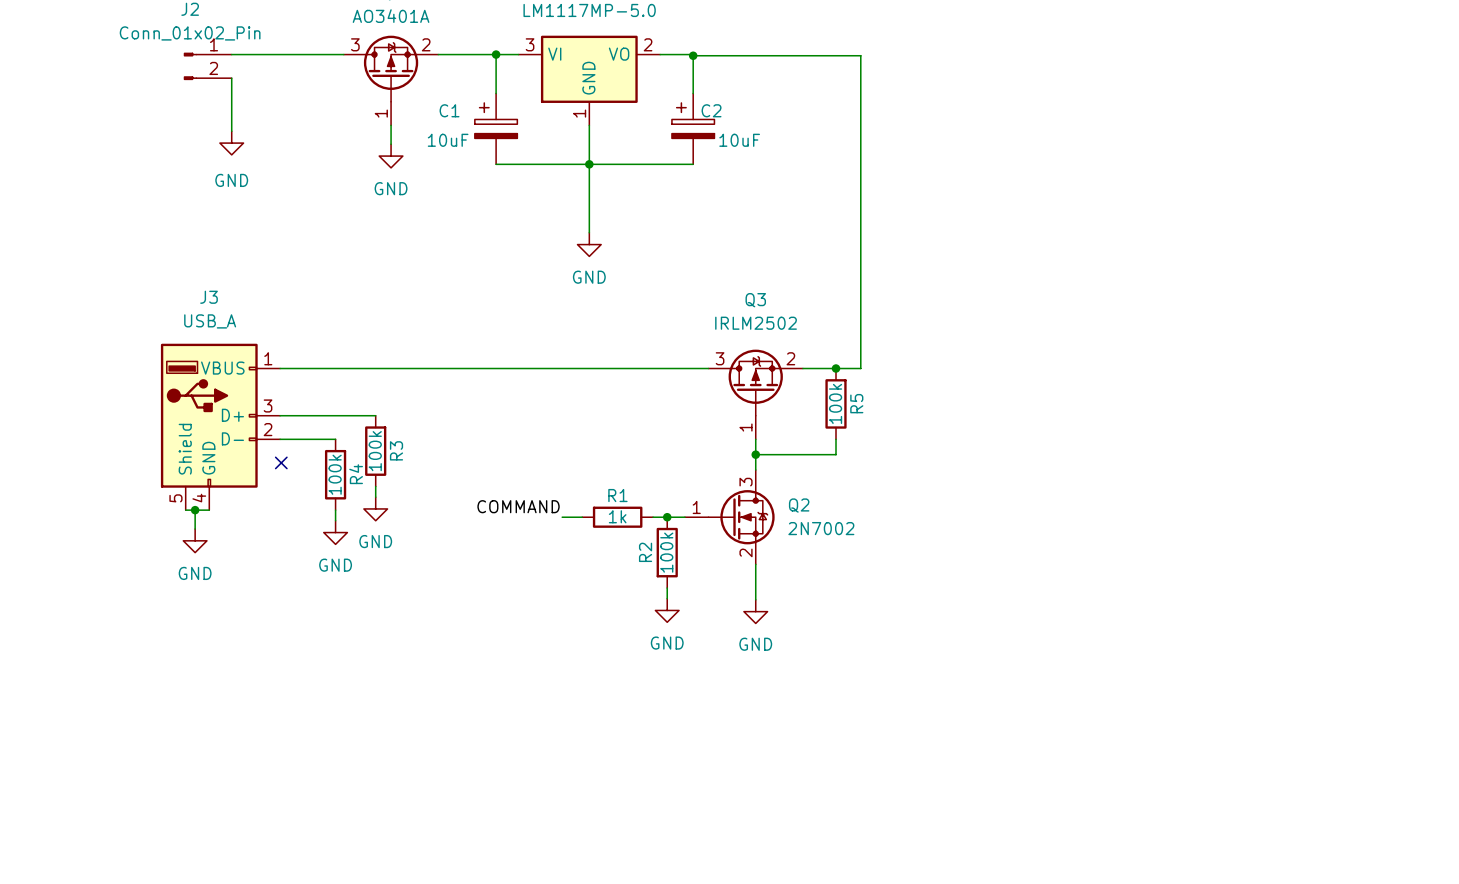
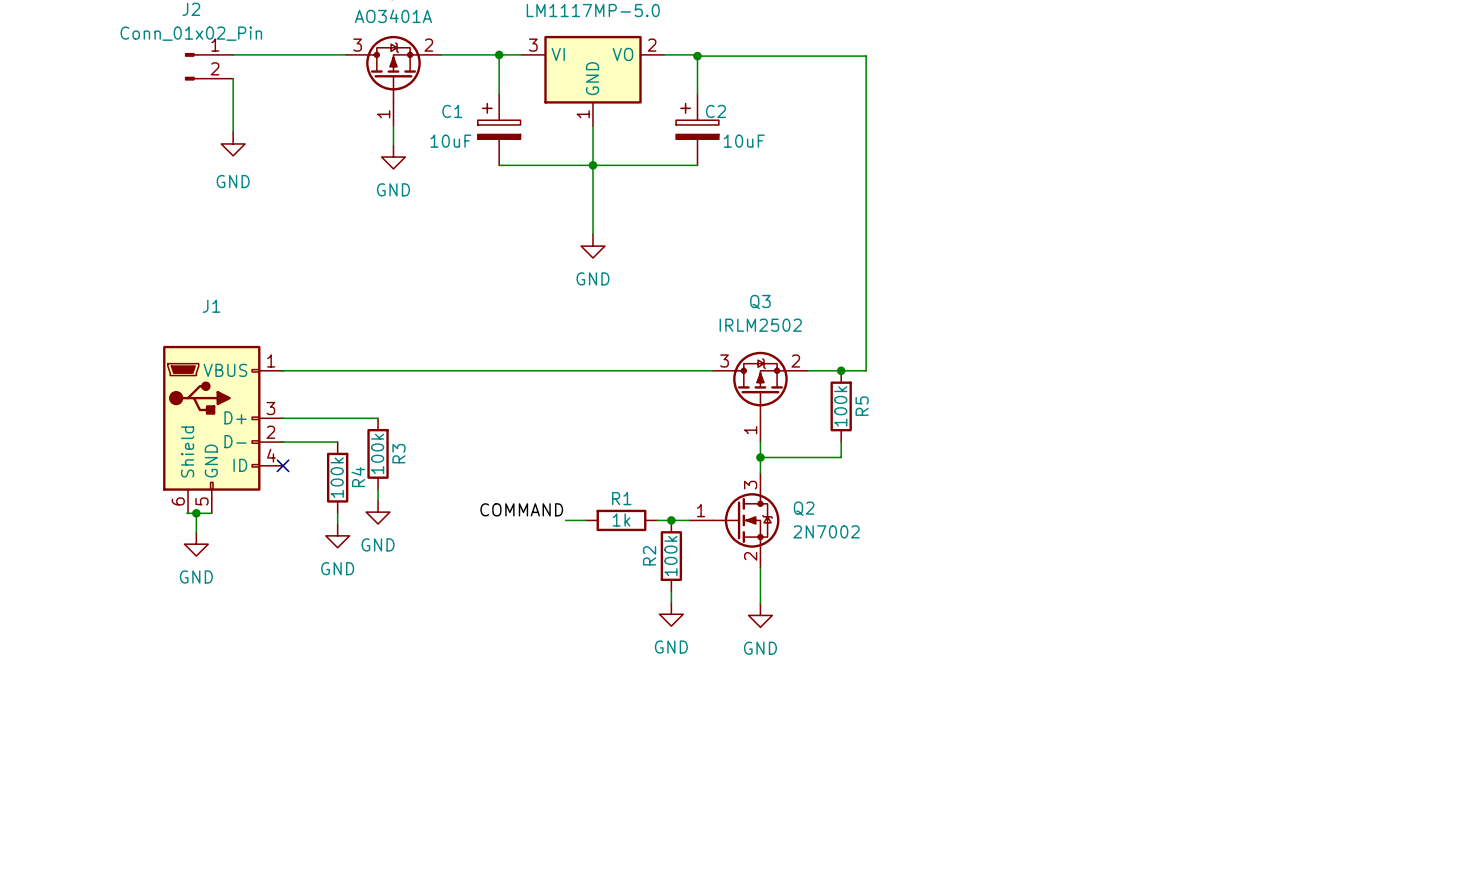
J3: USB_A (220, 426) -> none
J1: none -> (223, 429)

